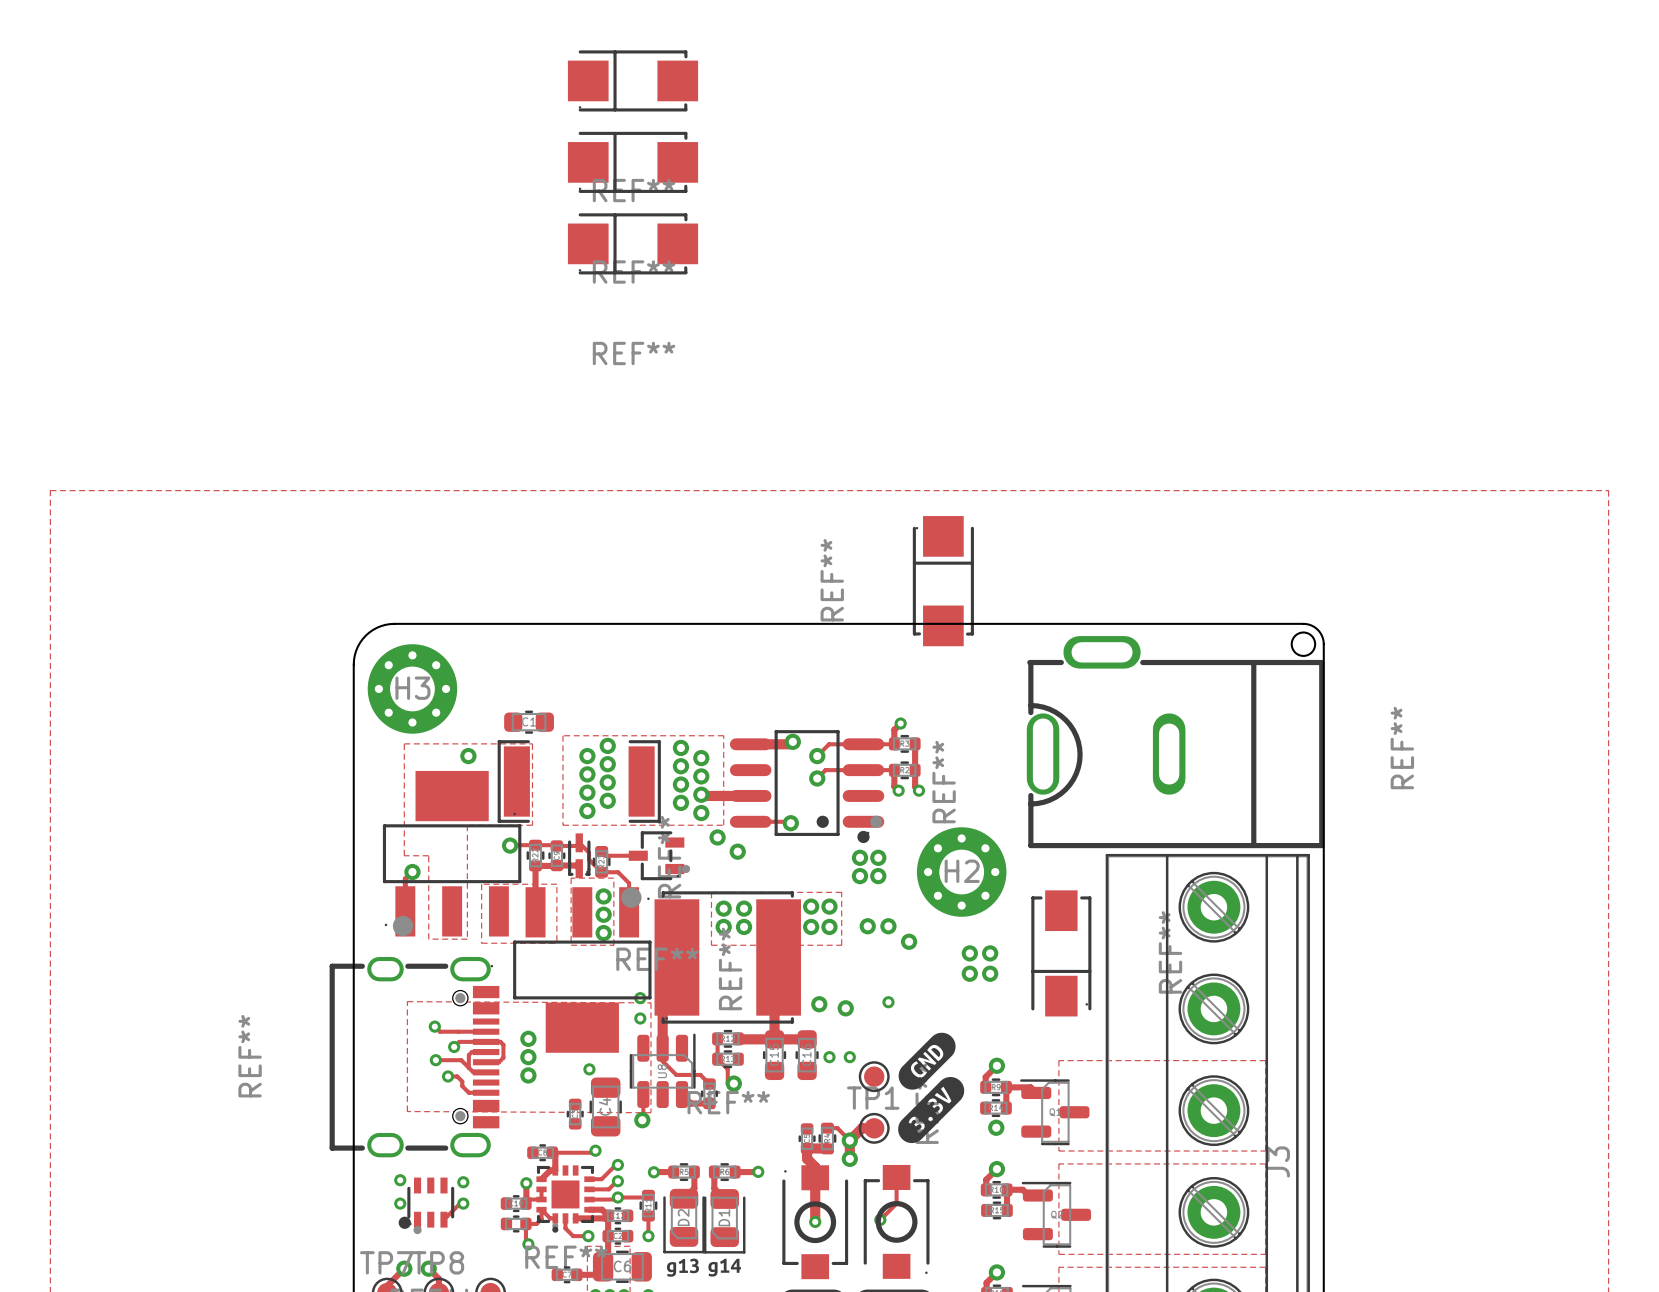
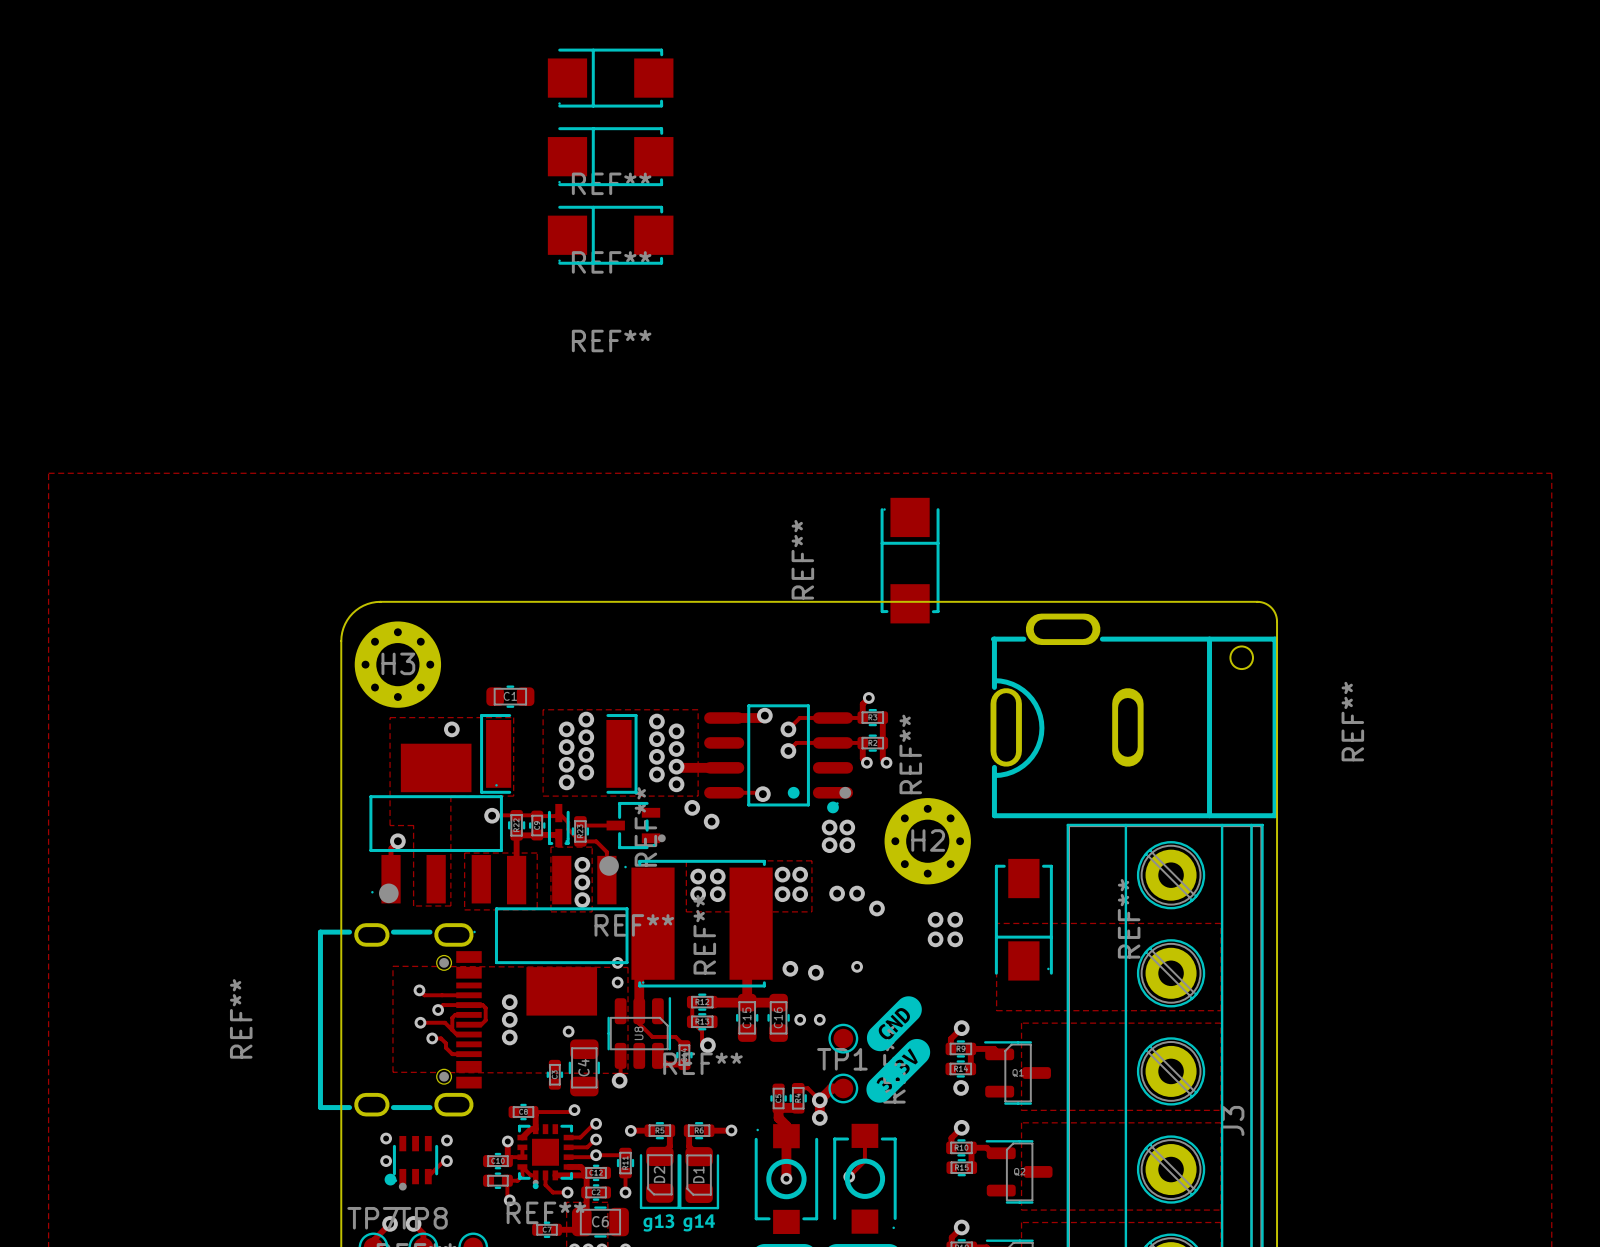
round board edge position: (1303, 644) -> (1241, 657)
zone outline: none -> (996, 923) (996, 1010) (1220, 1010) (1220, 923) (996, 923)

